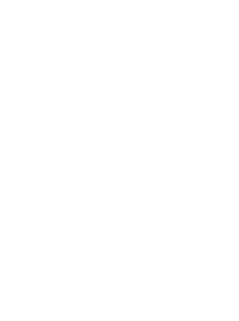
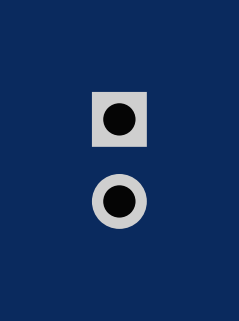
part: none -> (119, 160)

